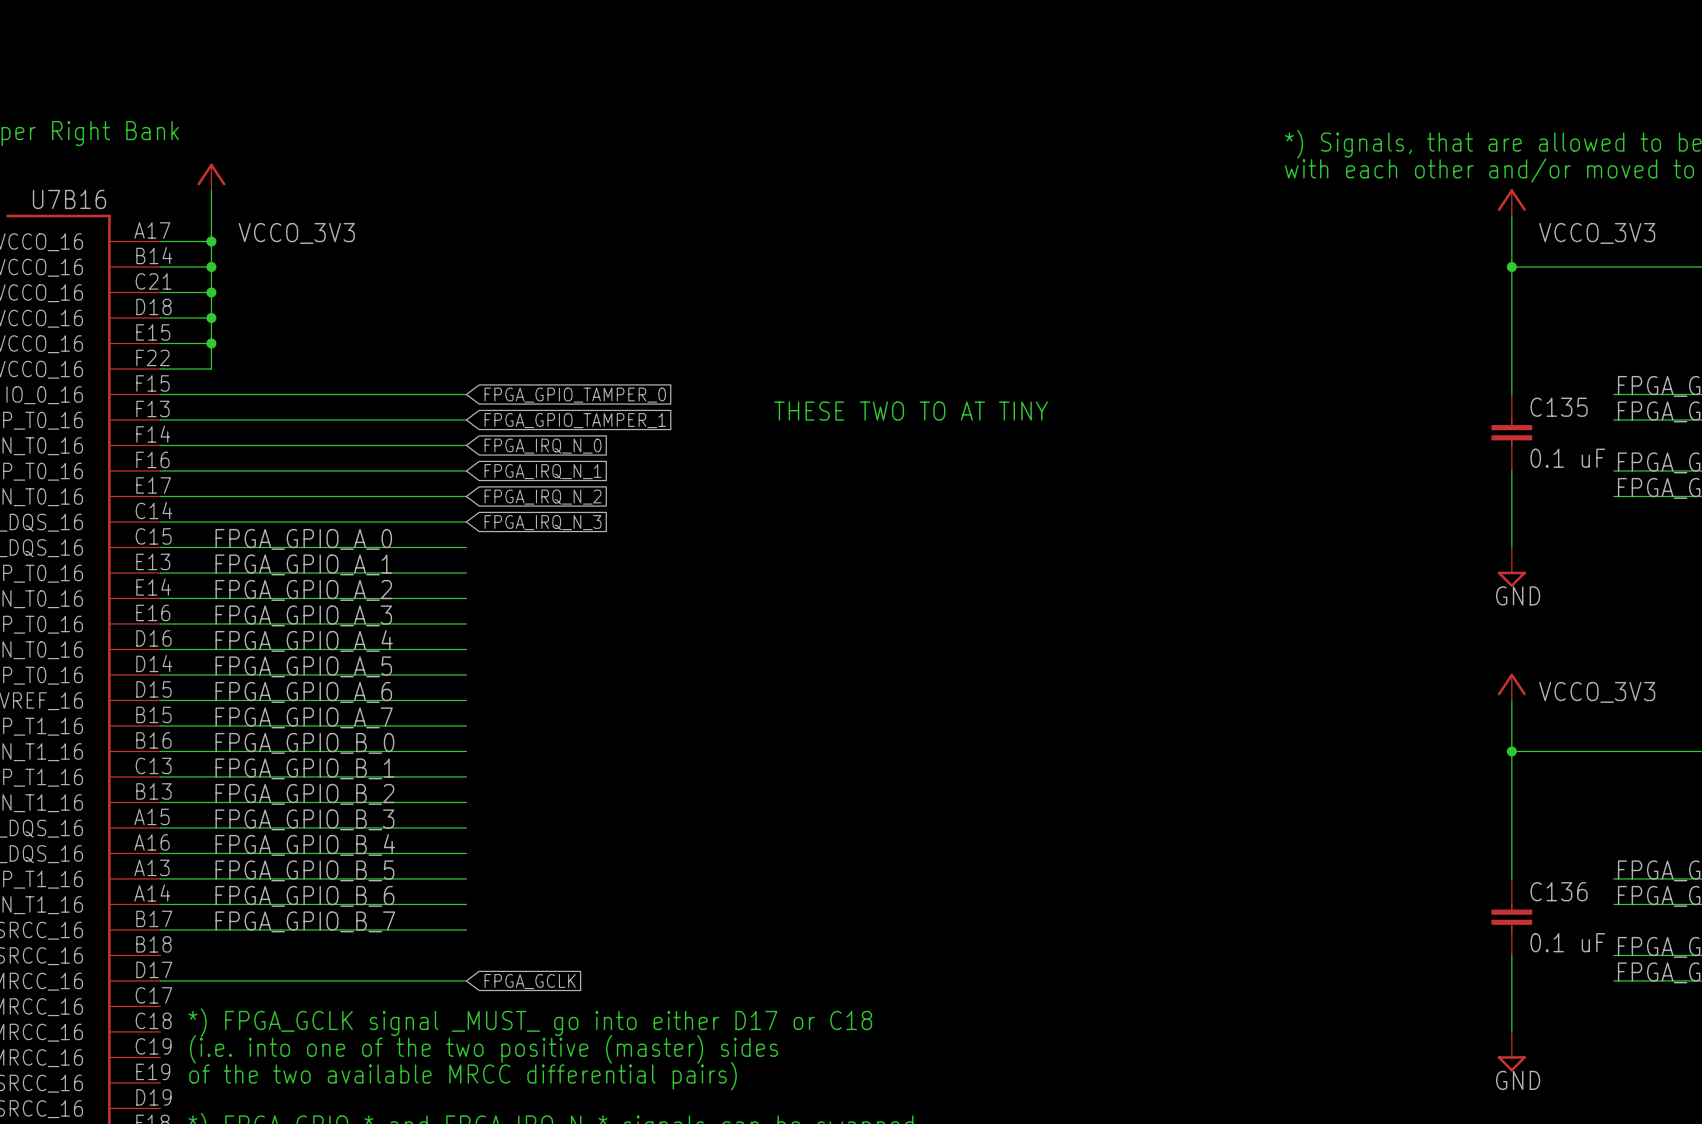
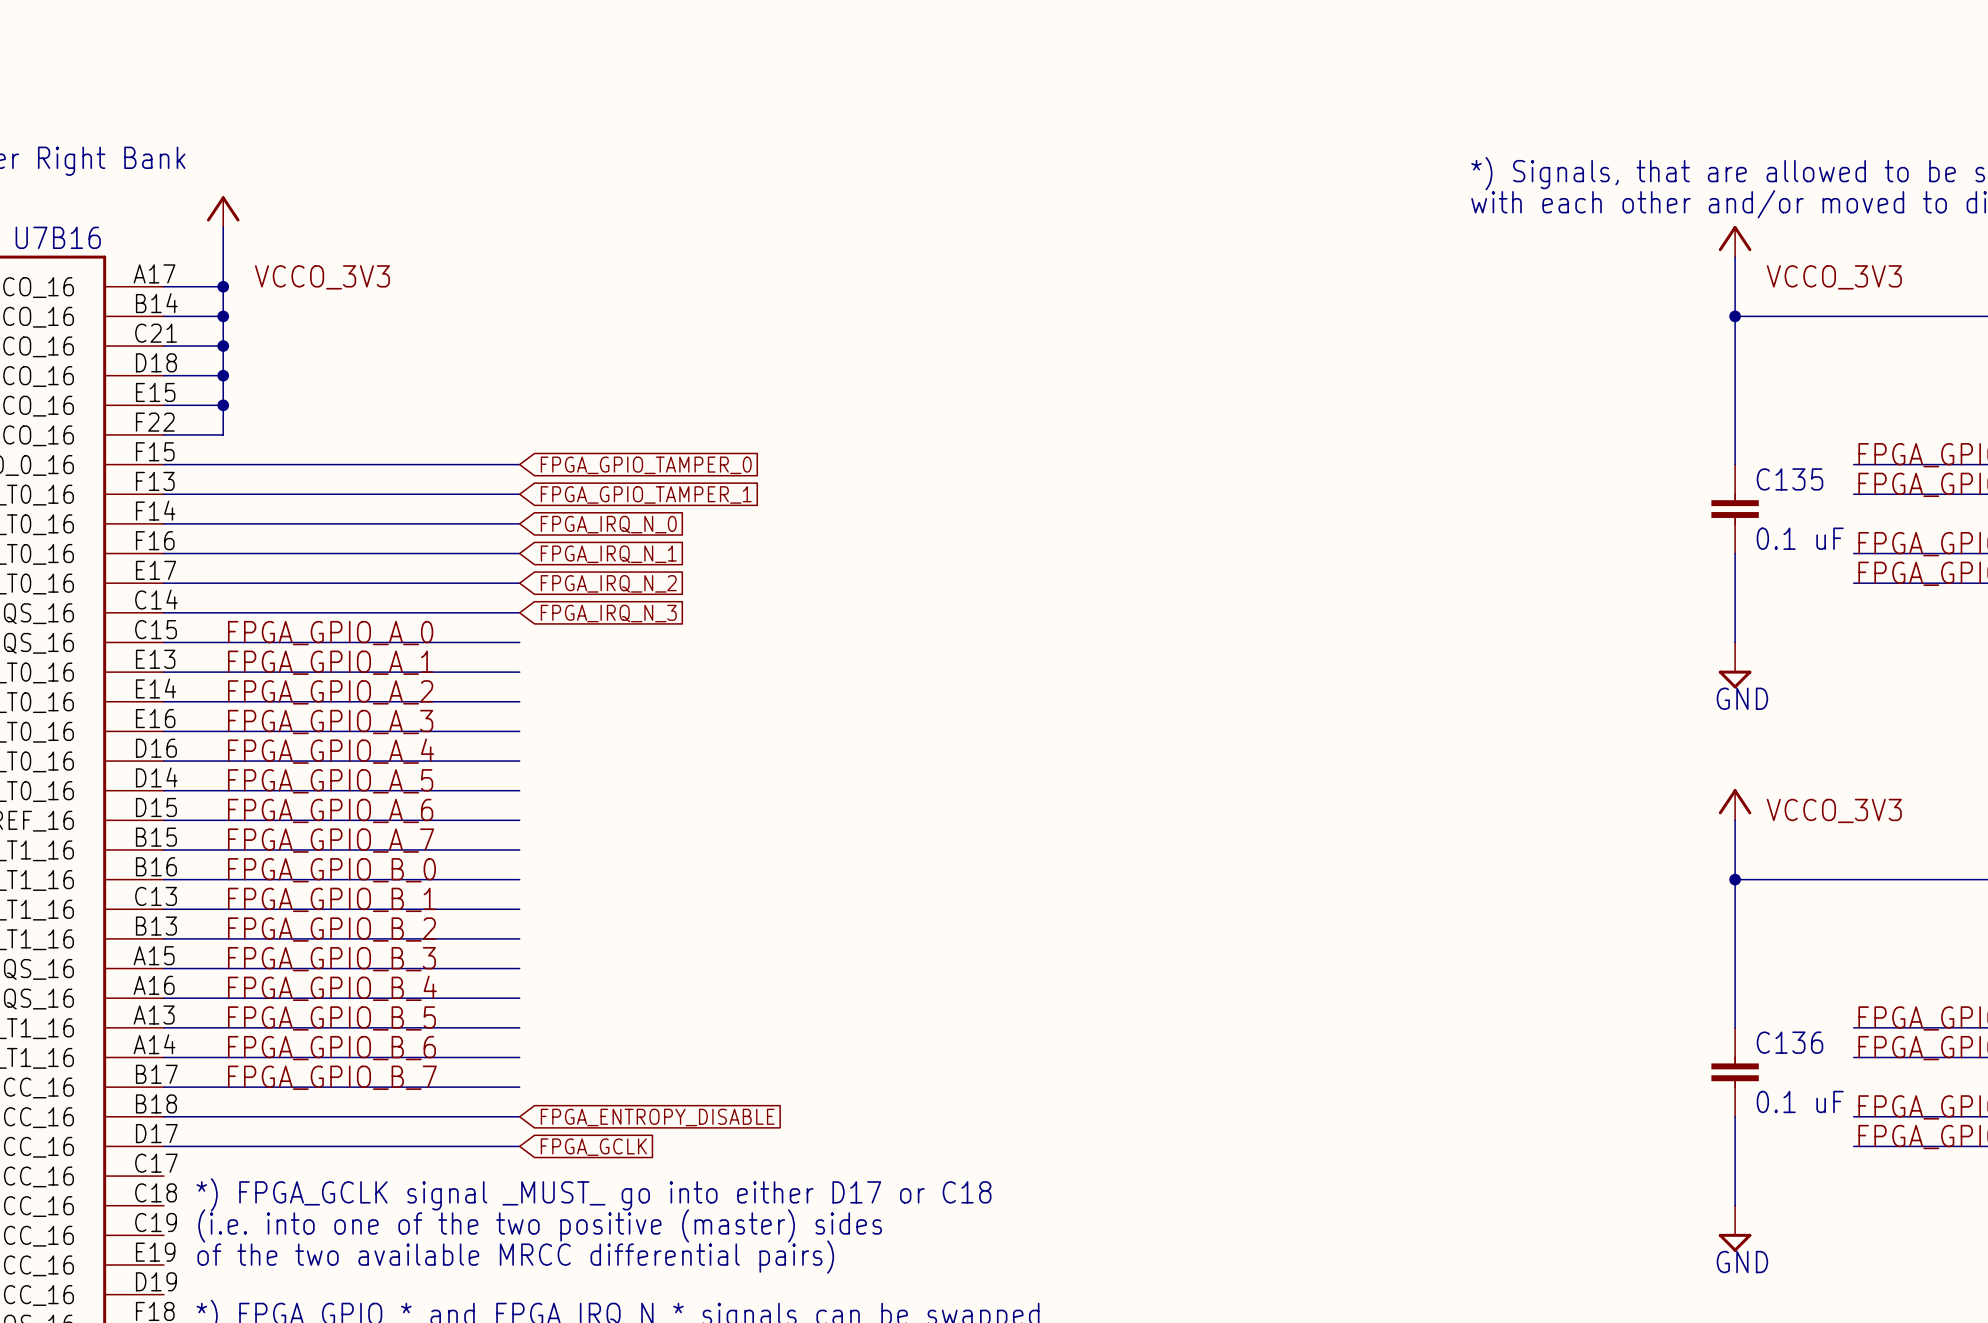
text: THESE TWO TO AT TINY (911, 411) -> none
wire: none -> (163, 1116) (519, 1116)
global label: none -> FPGA_ENTROPY_DISABLE (657, 1117)

